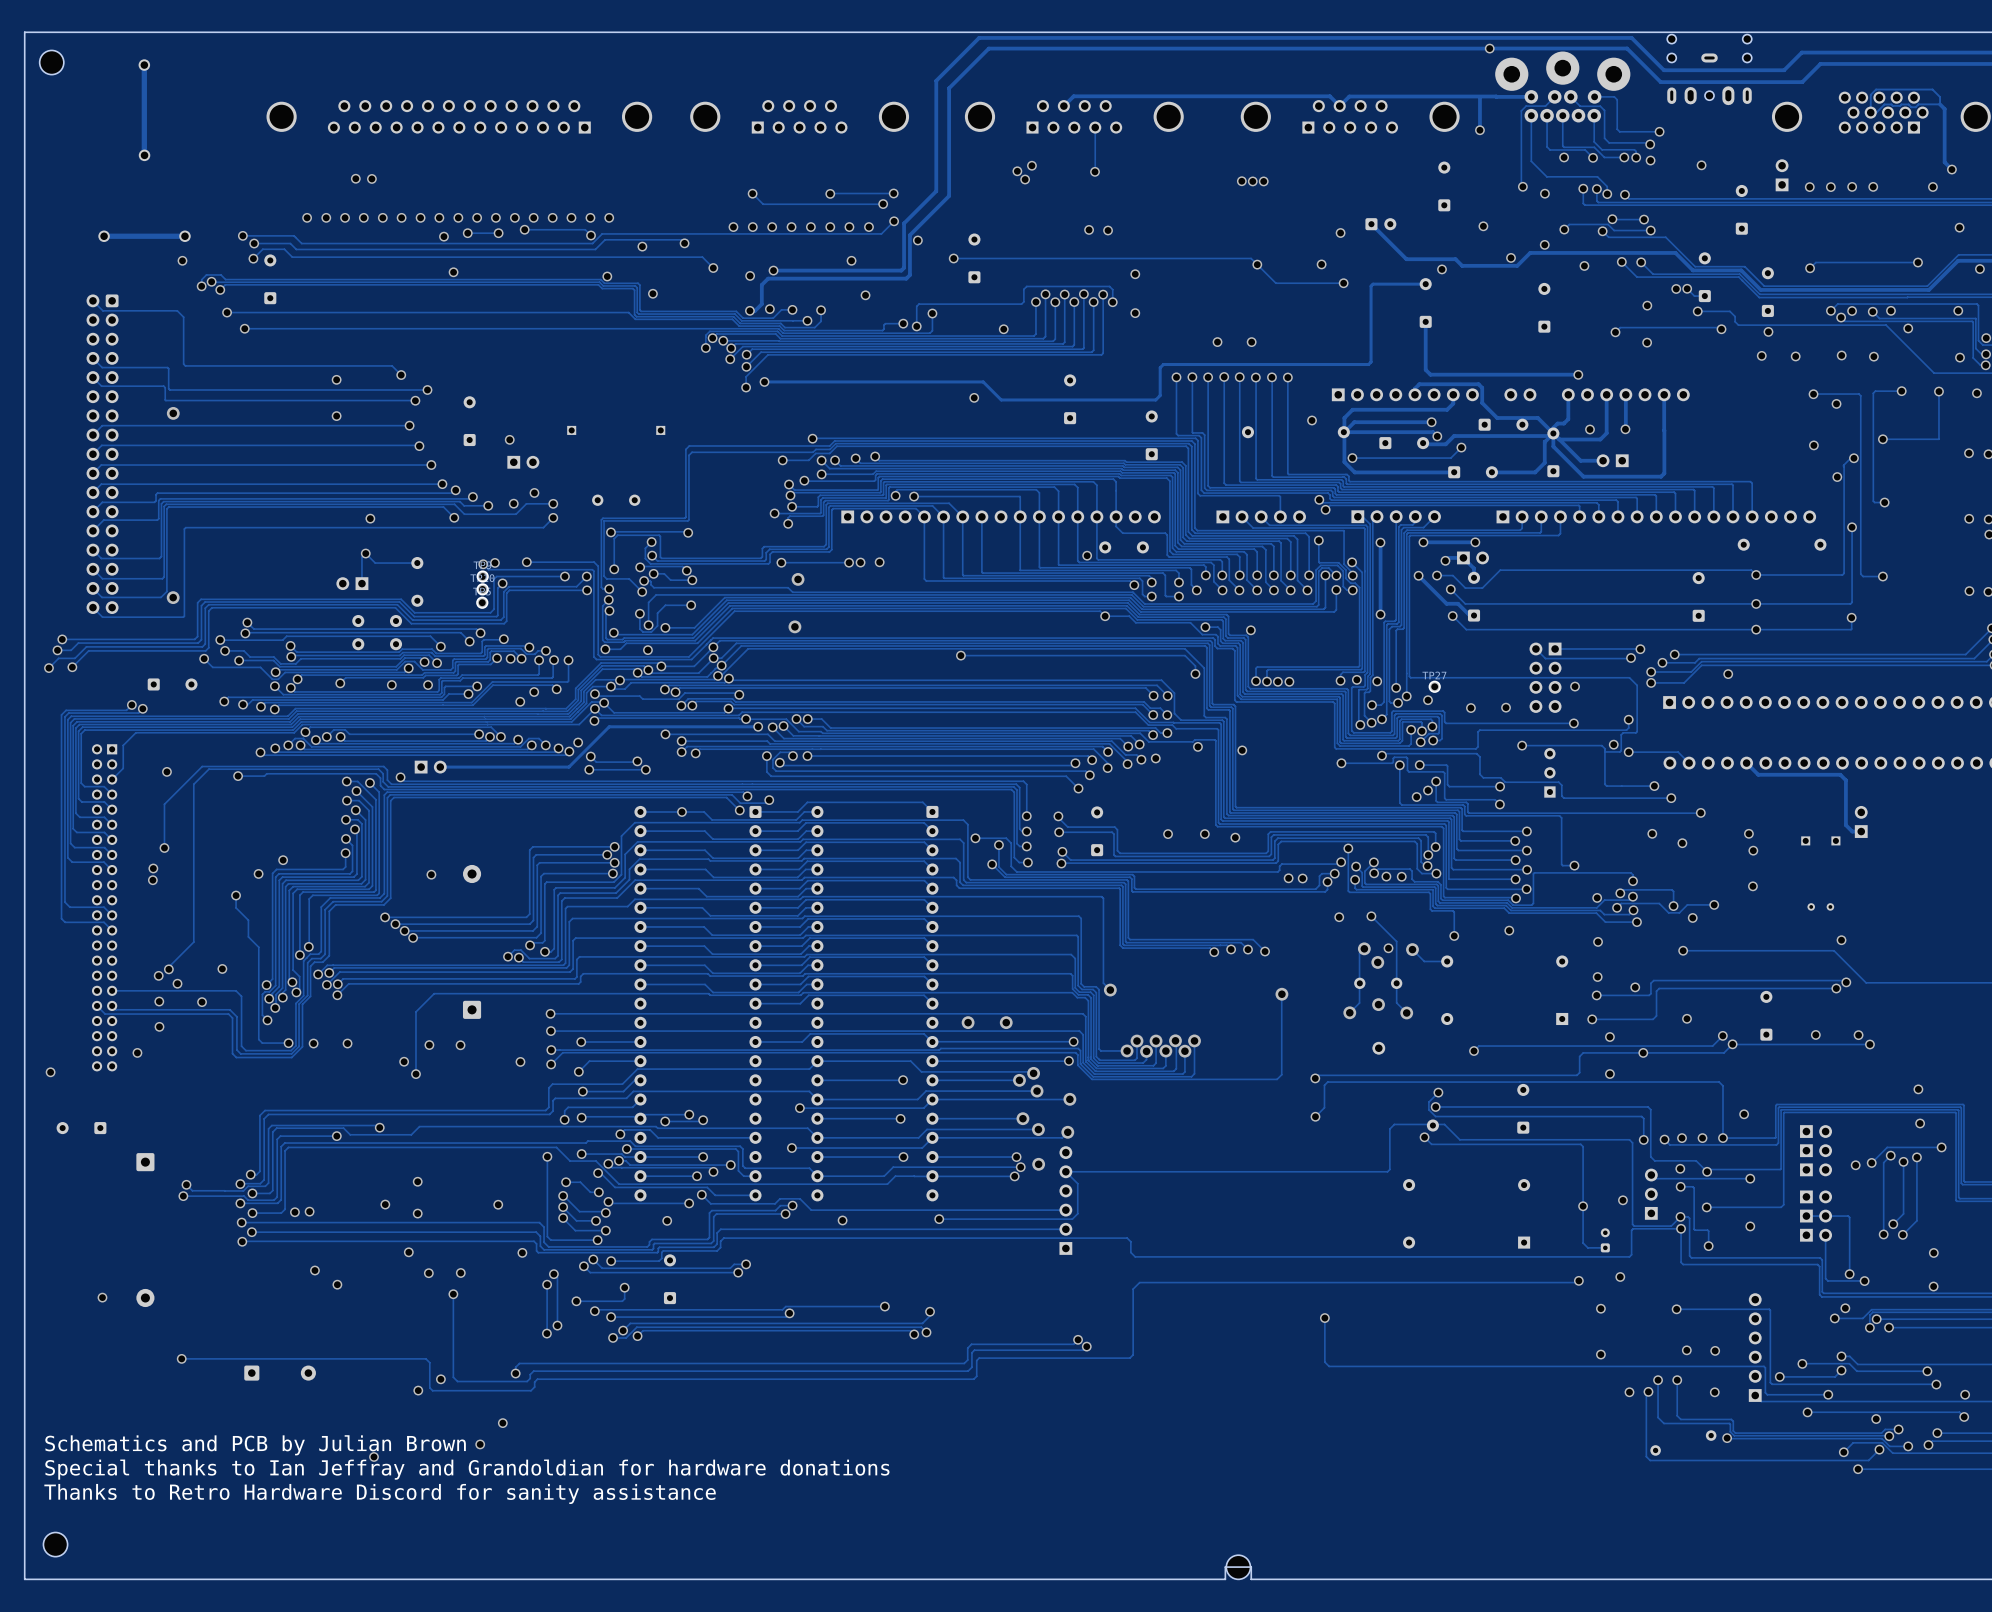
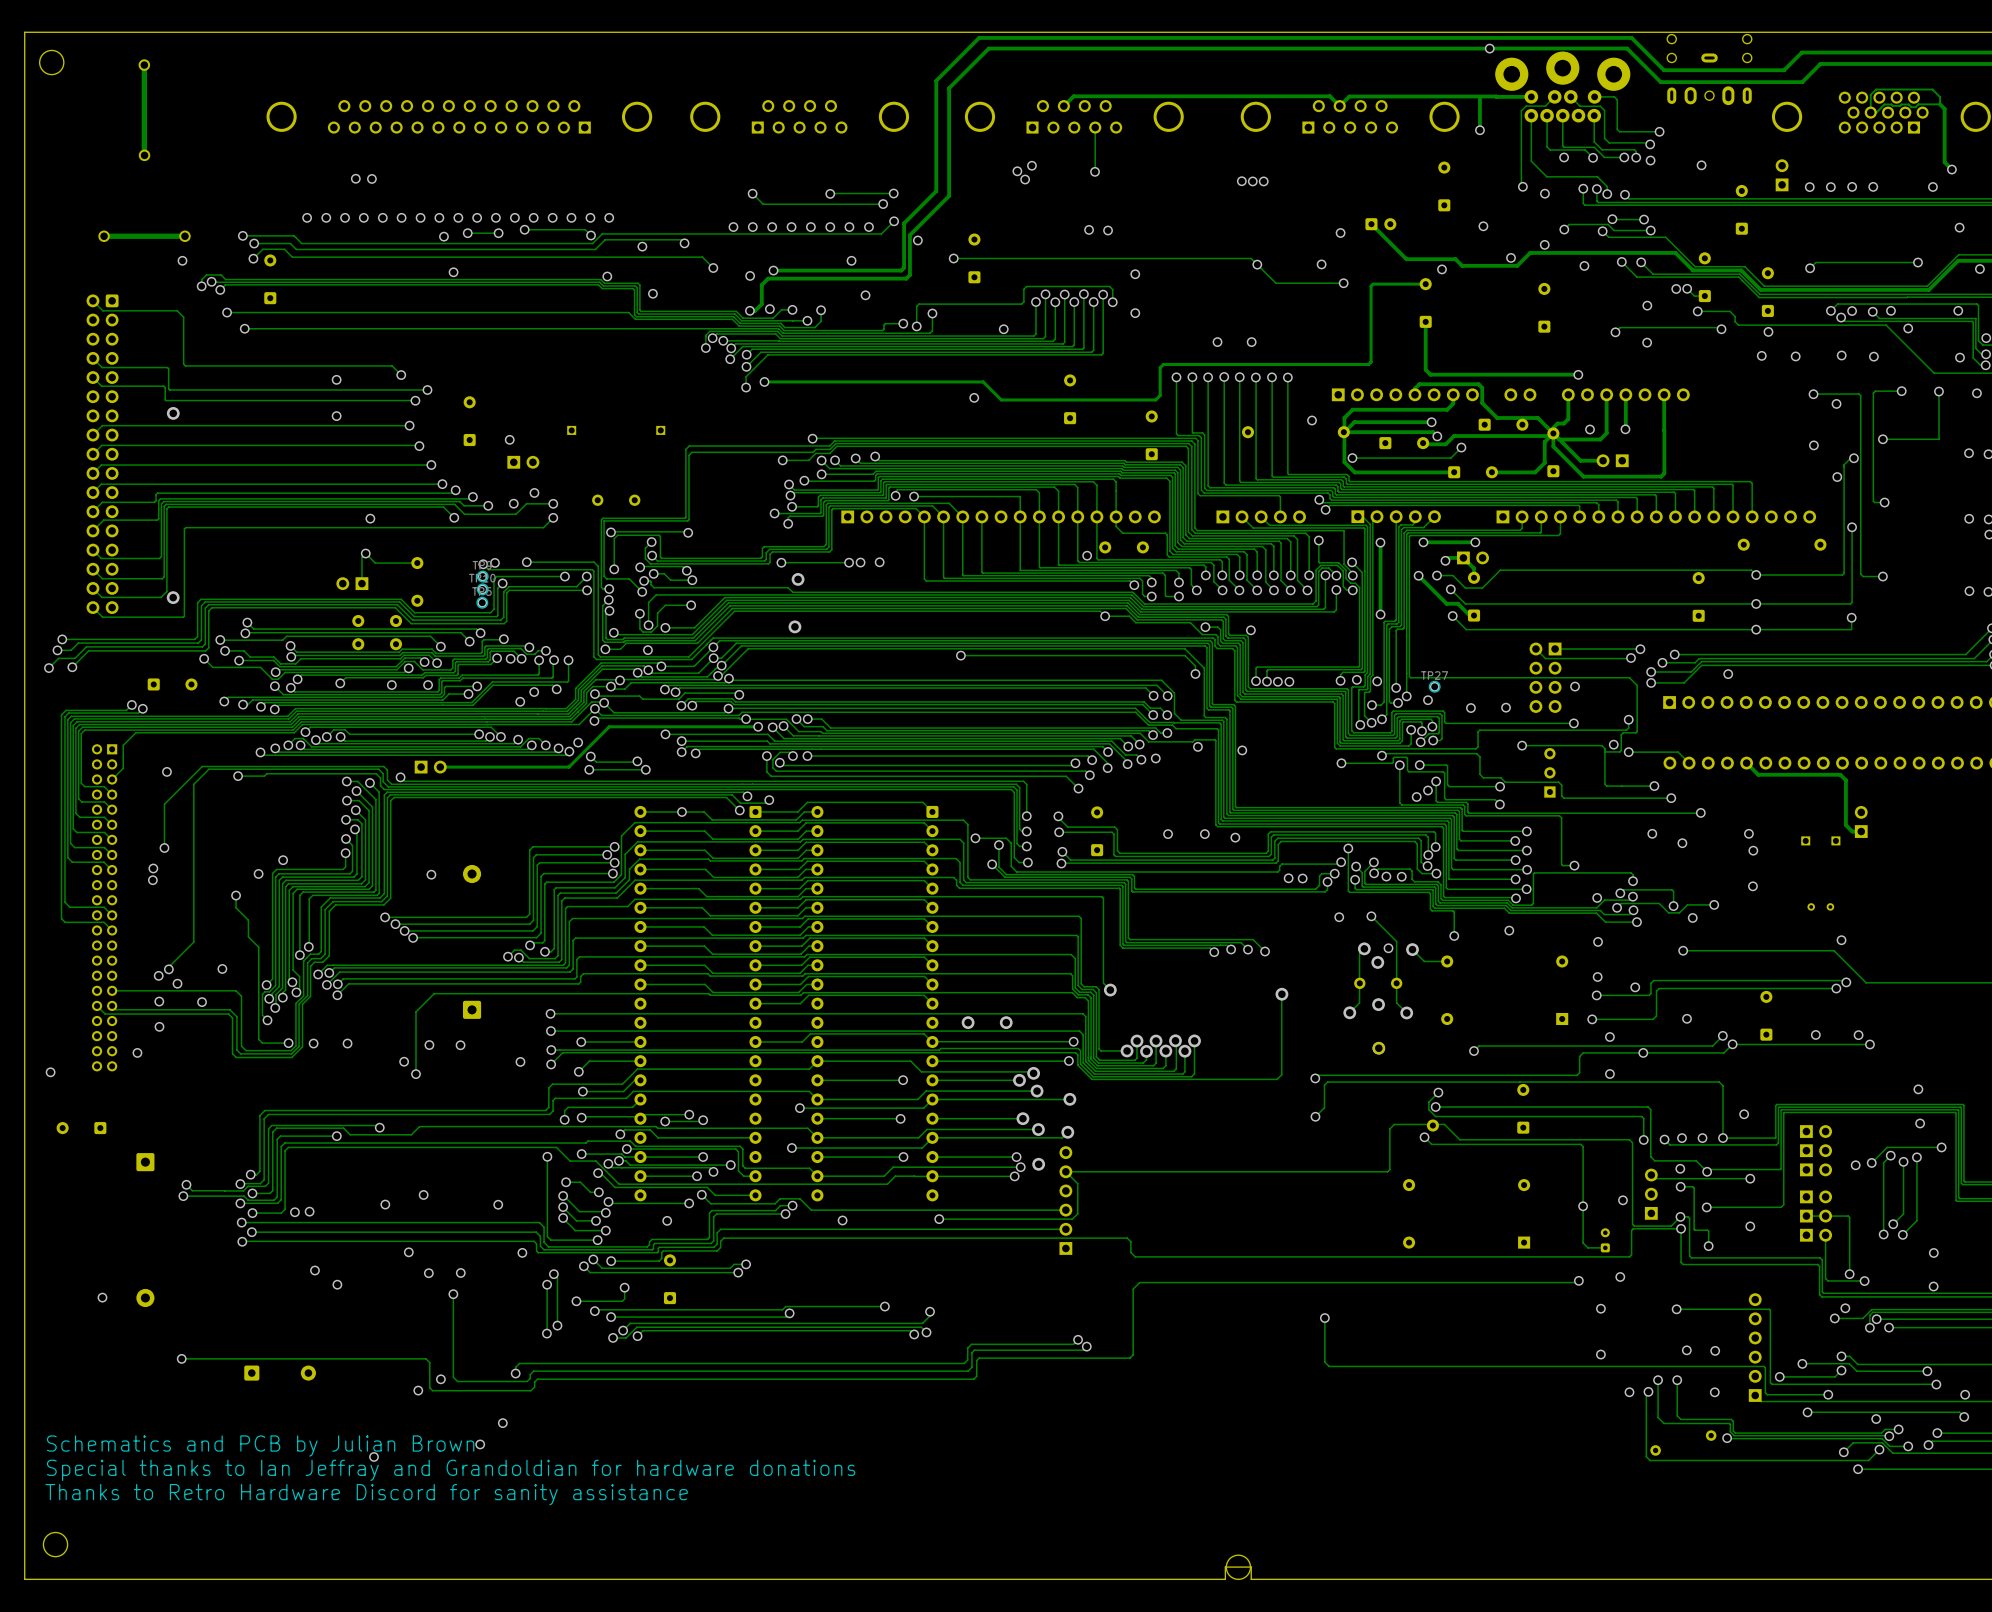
via: (417, 1181) -> none
via: none -> (423, 1194)
via: (417, 1213) -> none

